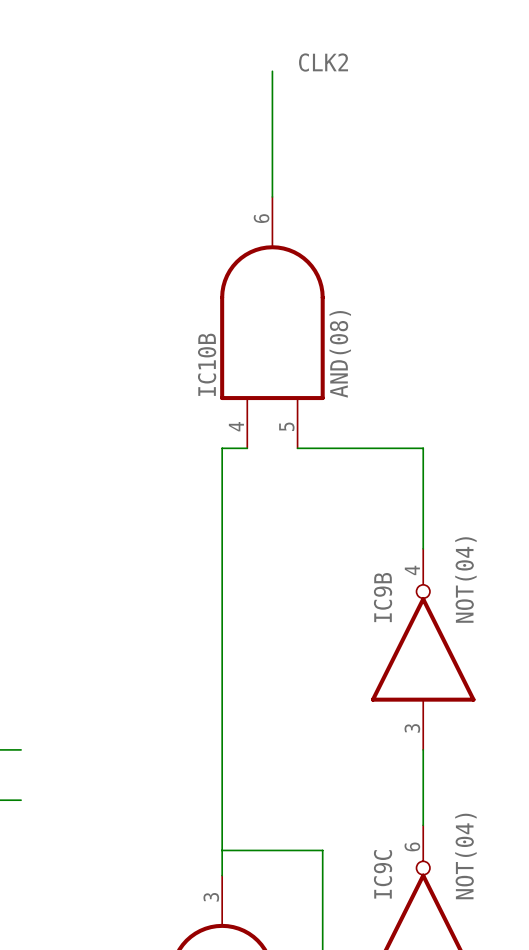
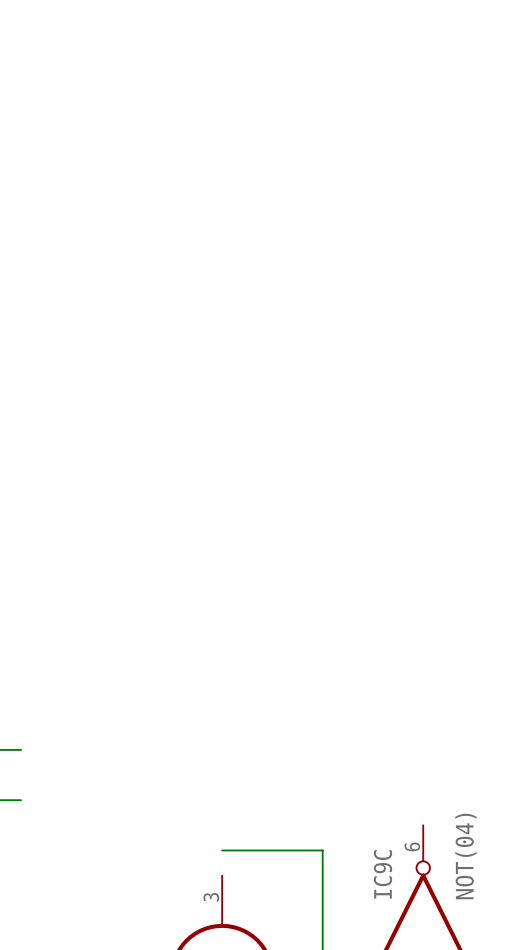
label: CLK2 (323, 62) -> none
wire: (272, 71) (272, 196) -> none
IC10B: AND(08) (272, 322) -> none
wire: (247, 448) (222, 448) (222, 875) -> none
wire: (297, 448) (423, 448) (423, 548) -> none
IC9B: NOT(04) (423, 649) -> none
wire: (423, 749) (423, 825) -> none

